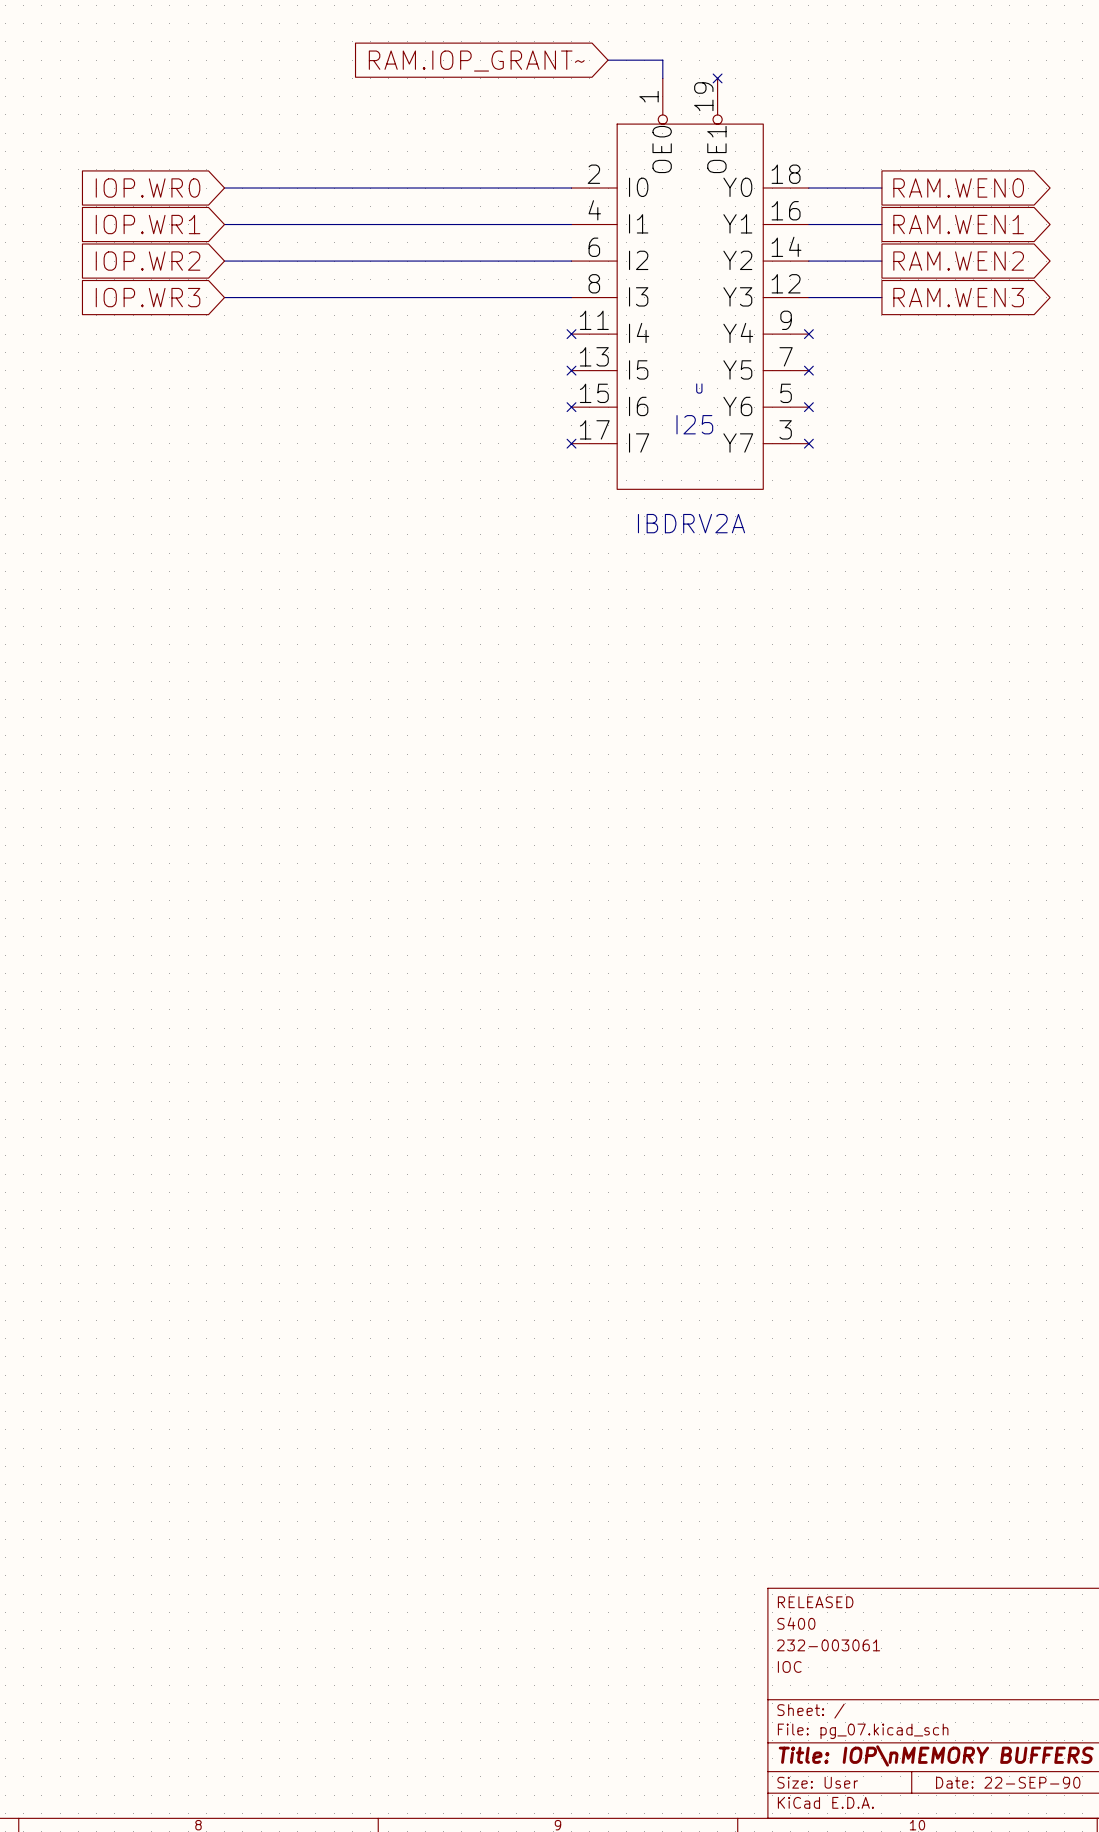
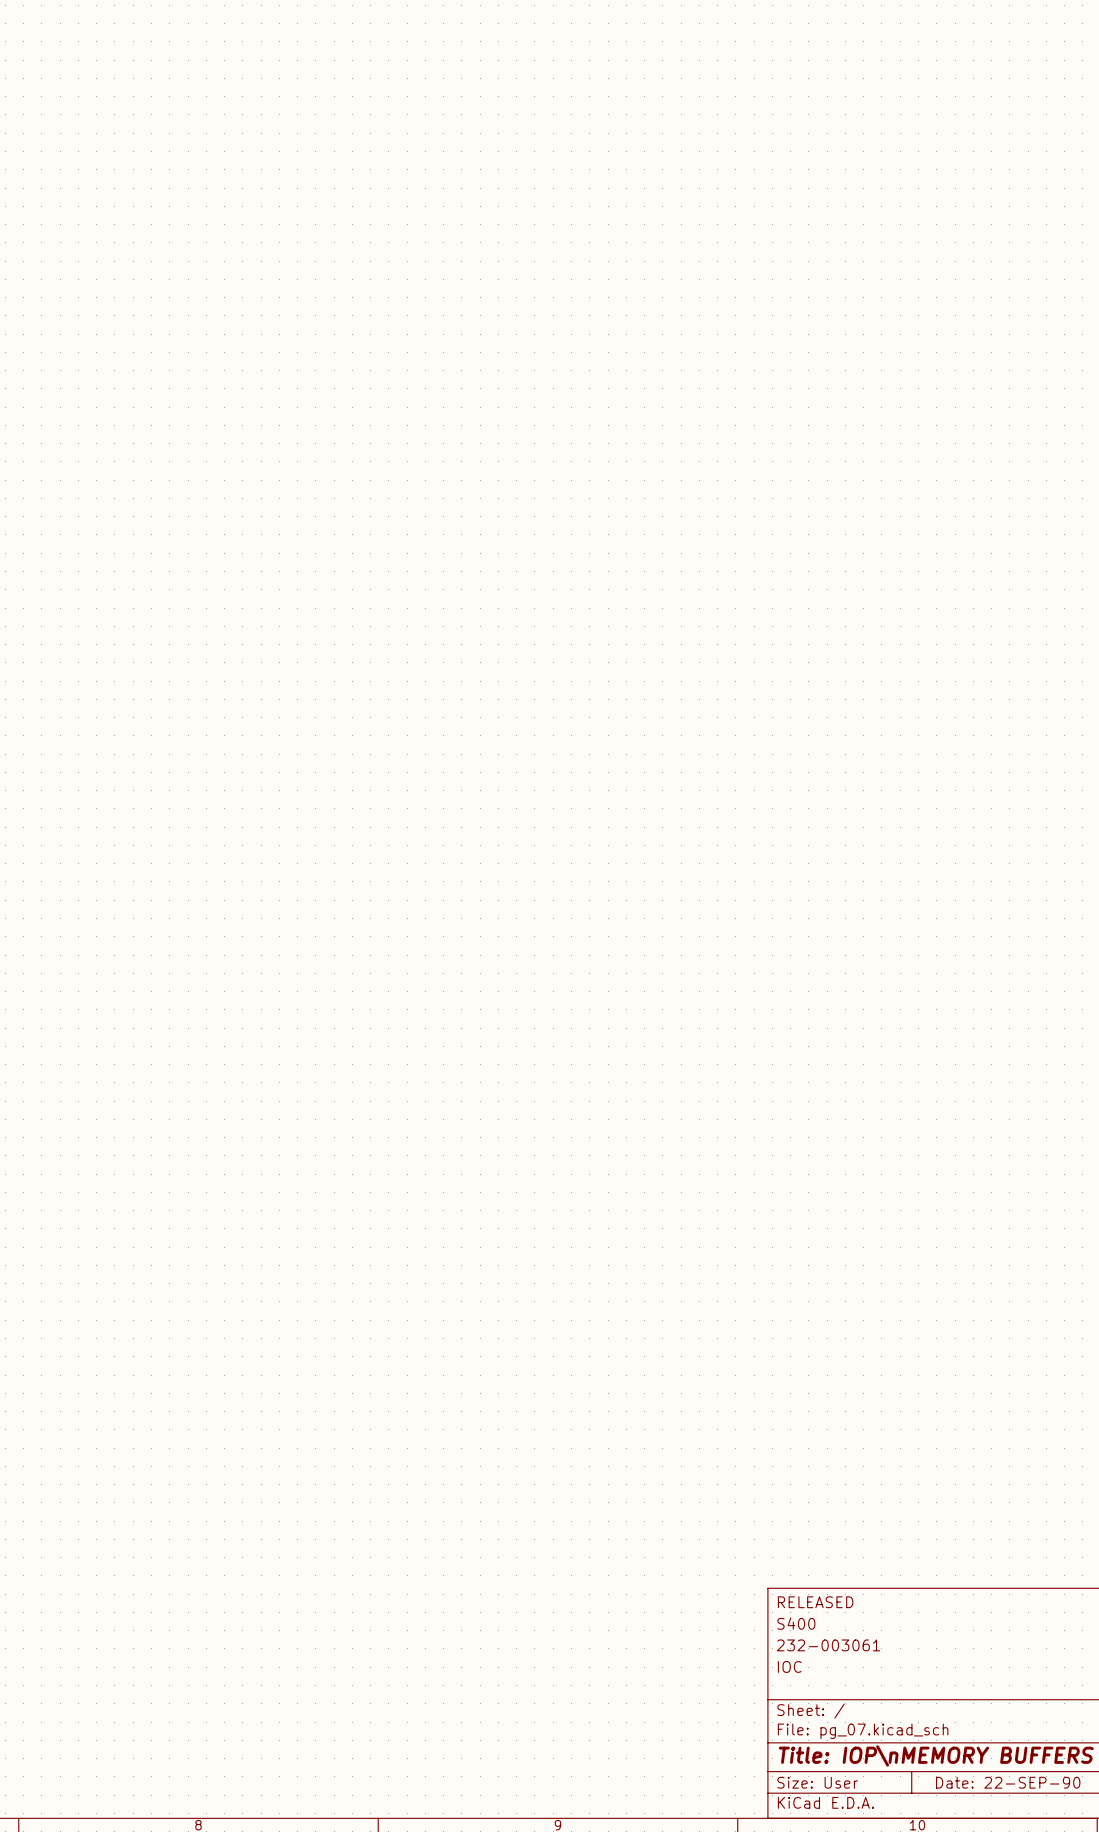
wire: (608, 60) (662, 60) (662, 78) -> none
global label: RAM.IOP_GRANT~ (476, 61) -> none
no-connect mark: (717, 78) -> none
global label: IOP.WR0 (148, 188) -> none
wire: (224, 188) (571, 188) -> none
wire: (808, 188) (881, 188) -> none
global label: RAM.WEN0 (958, 188) -> none
global label: IOP.WR1 (148, 224) -> none
wire: (224, 224) (571, 224) -> none
wire: (808, 224) (881, 224) -> none
global label: RAM.WEN1 (958, 224) -> none
global label: IOP.WR2 (148, 261) -> none
wire: (224, 261) (571, 261) -> none
wire: (808, 261) (881, 261) -> none
global label: RAM.WEN2 (958, 261) -> none
U: (690, 283) -> none
global label: IOP.WR3 (148, 297) -> none
wire: (224, 297) (571, 297) -> none
wire: (808, 297) (881, 297) -> none
global label: RAM.WEN3 (958, 297) -> none
no-connect mark: (571, 334) -> none
no-connect mark: (808, 334) -> none
no-connect mark: (571, 370) -> none
no-connect mark: (808, 370) -> none
no-connect mark: (571, 407) -> none
no-connect mark: (808, 407) -> none
no-connect mark: (571, 443) -> none
no-connect mark: (808, 443) -> none

